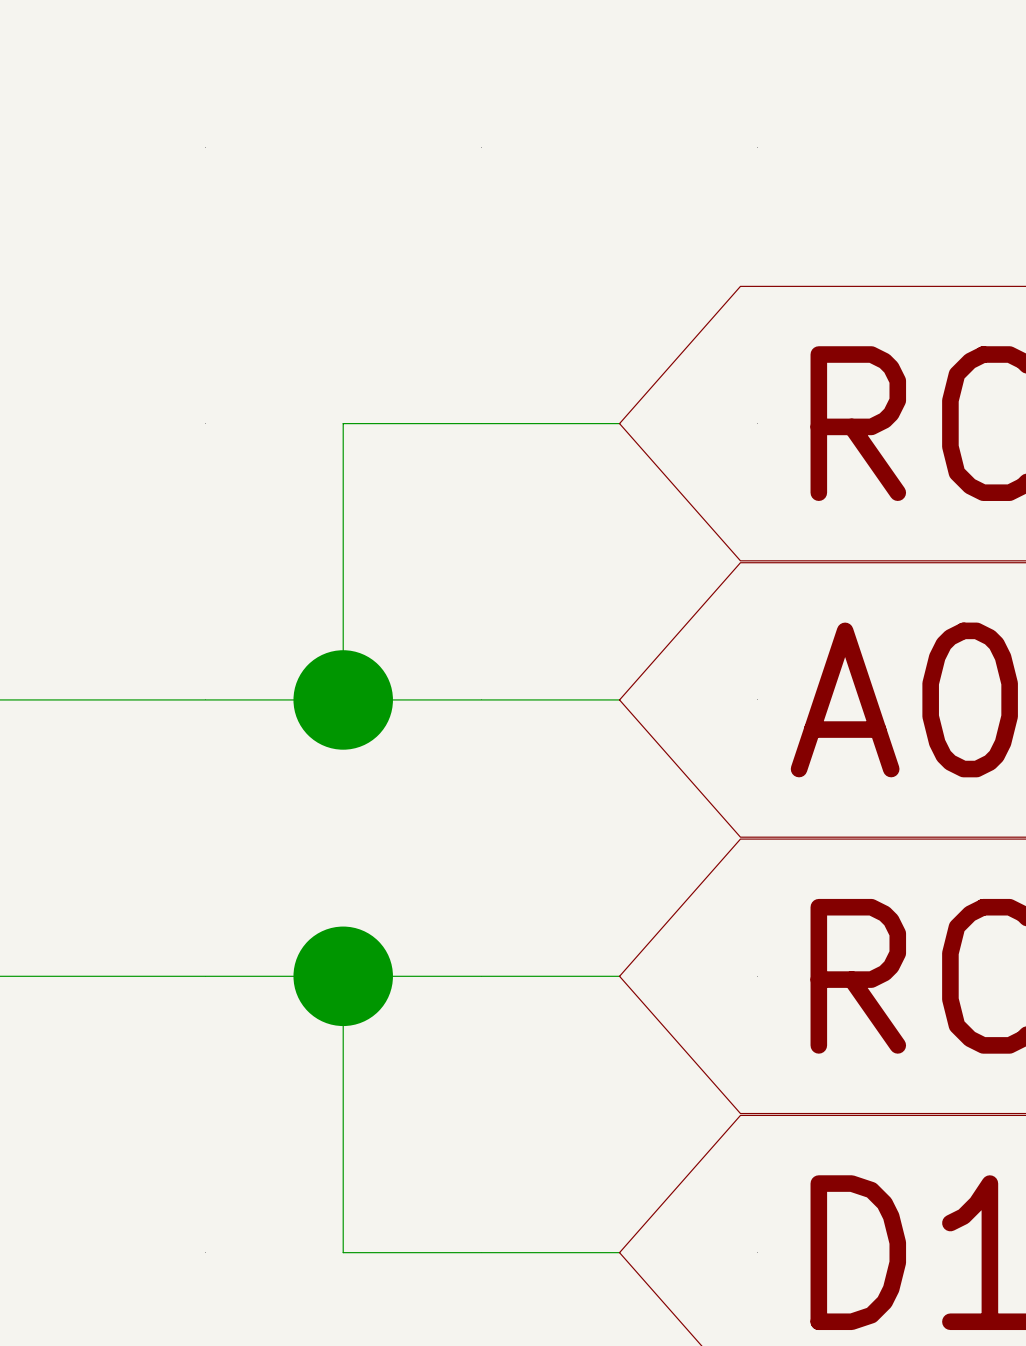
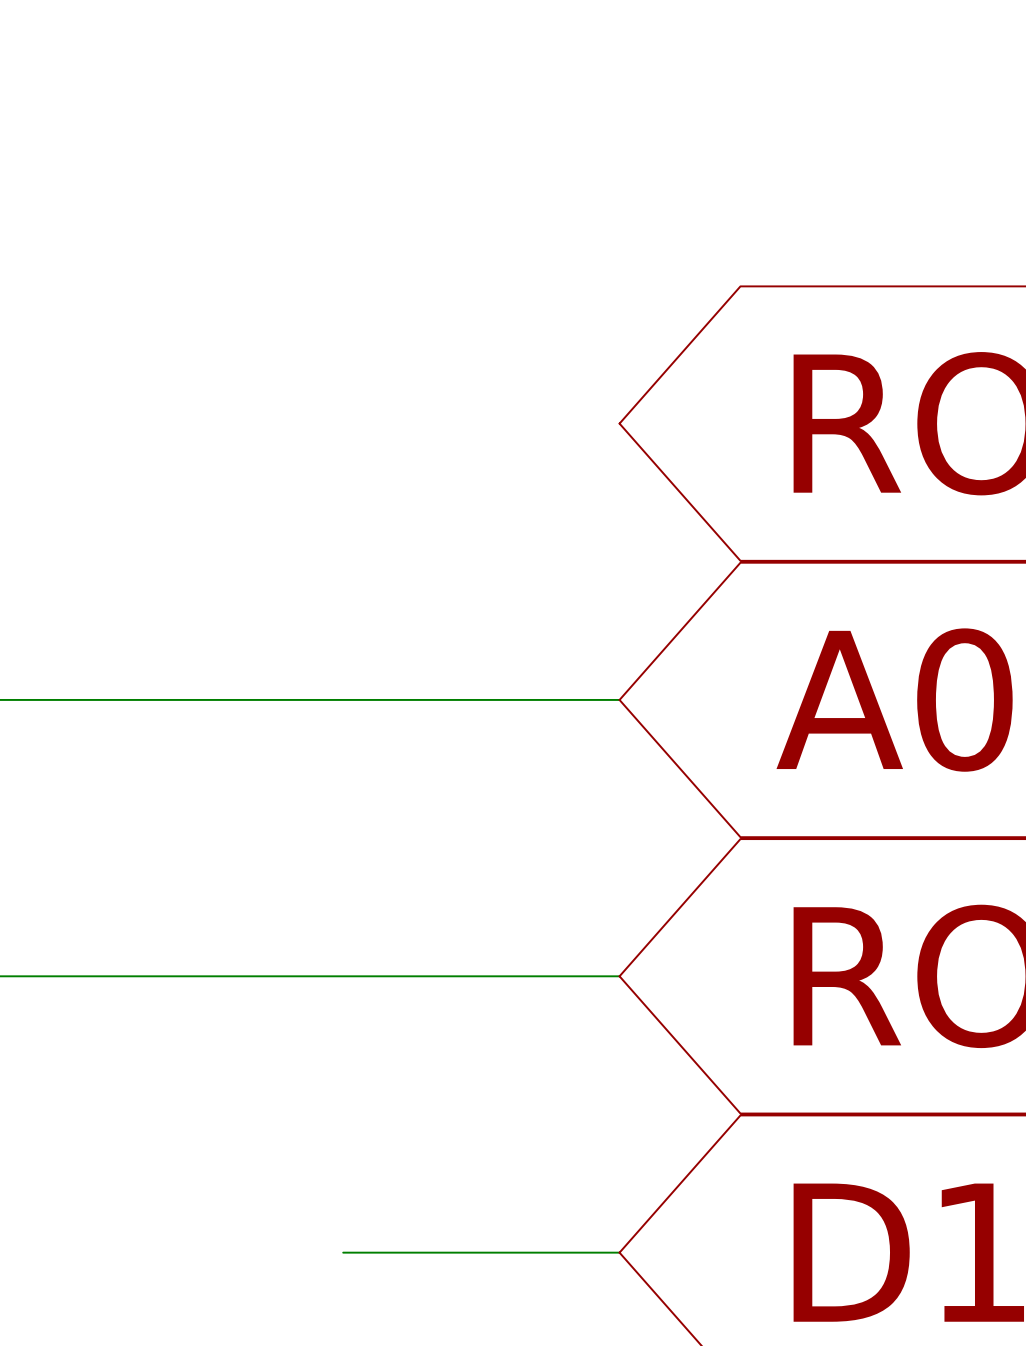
wire: (619, 423) (343, 423) (343, 699) -> none
junction: (343, 699) -> none
wire: (343, 976) (343, 1252) -> none
junction: (343, 976) -> none

